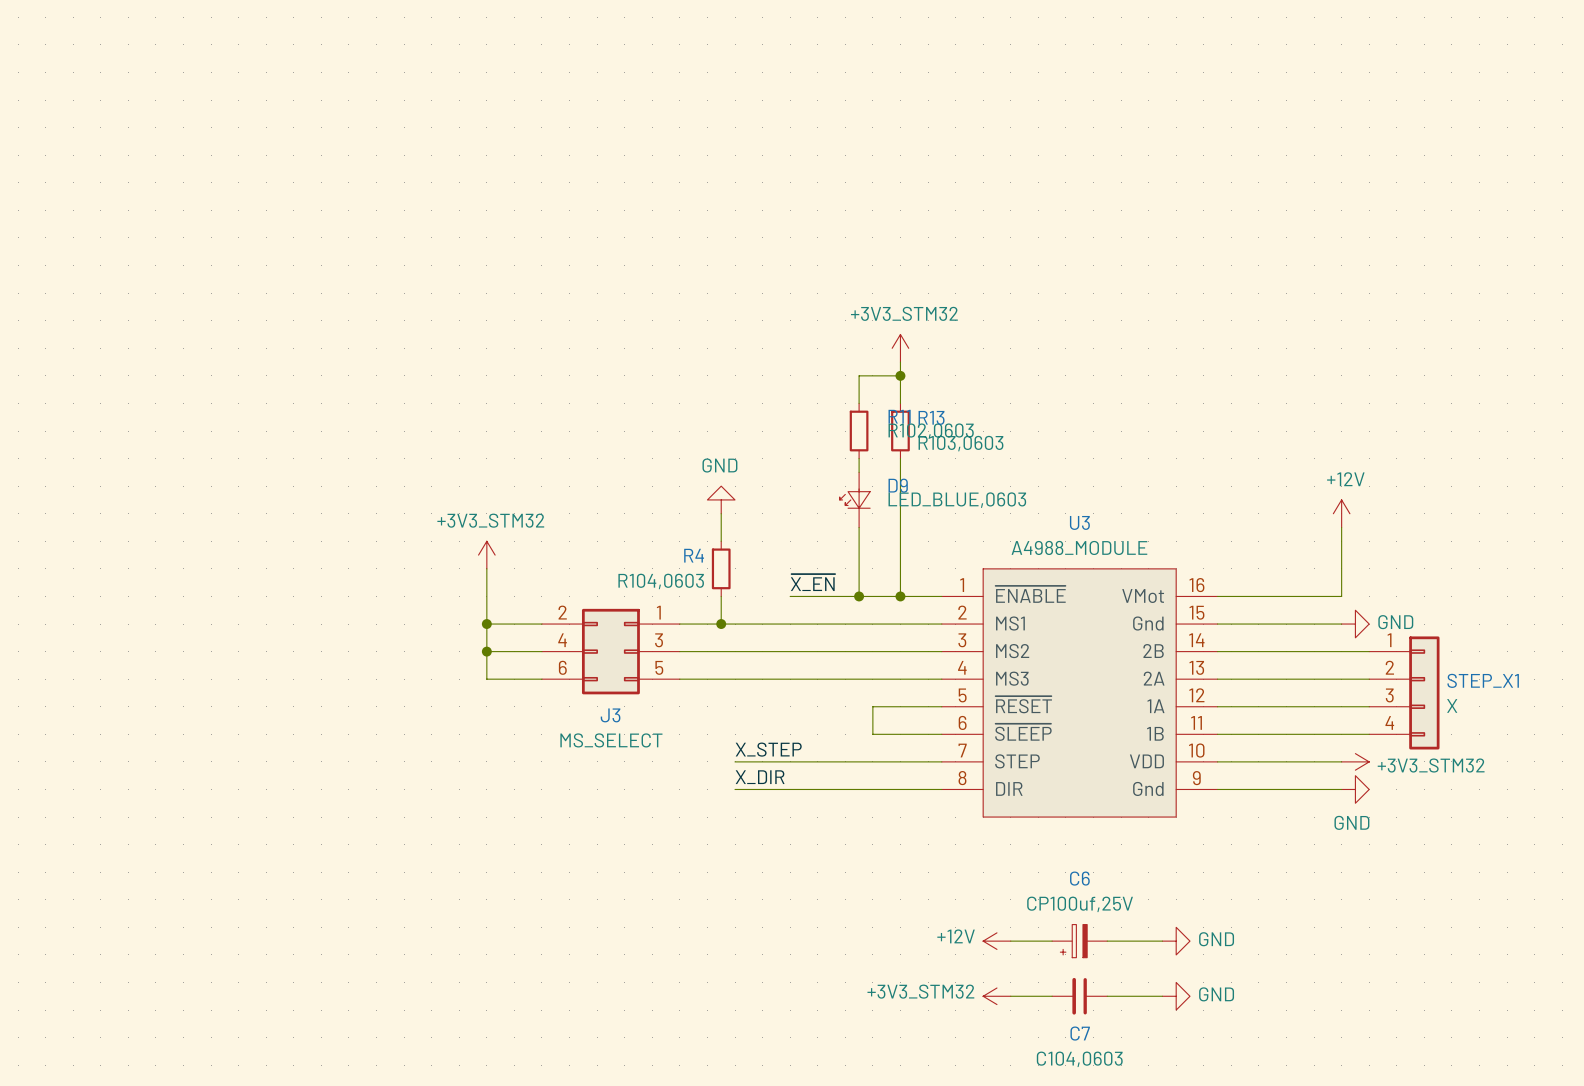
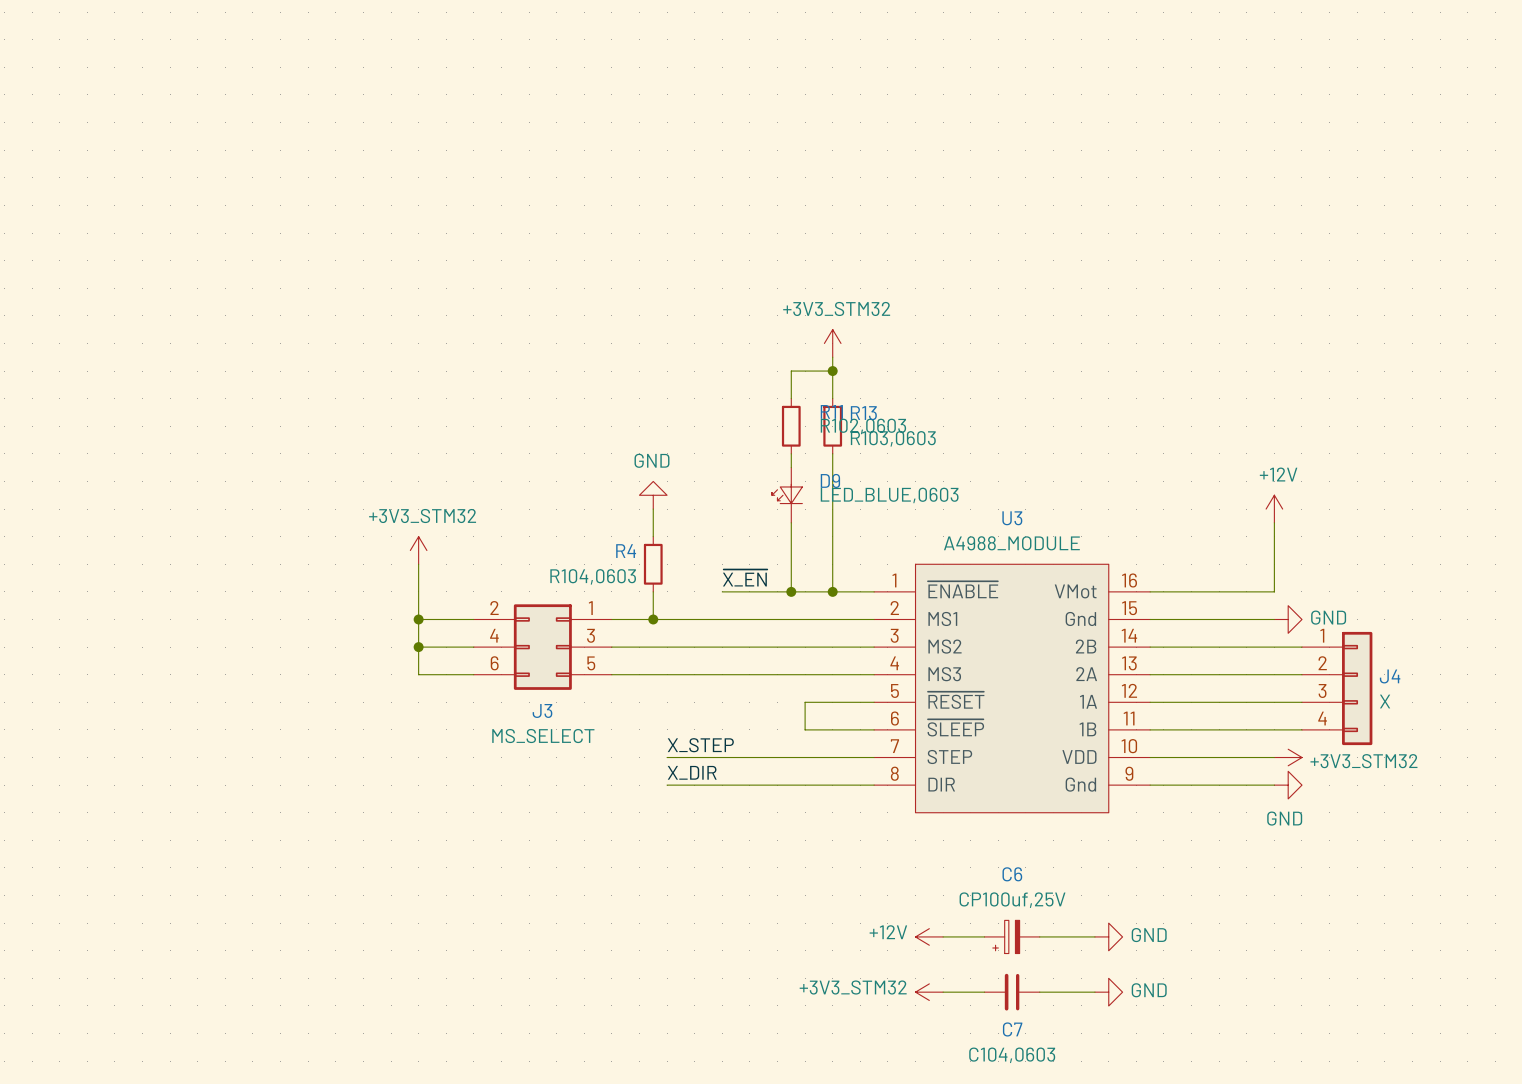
STEP_X1 name: STEP_X1 (1483, 680) -> J4 (1390, 676)

